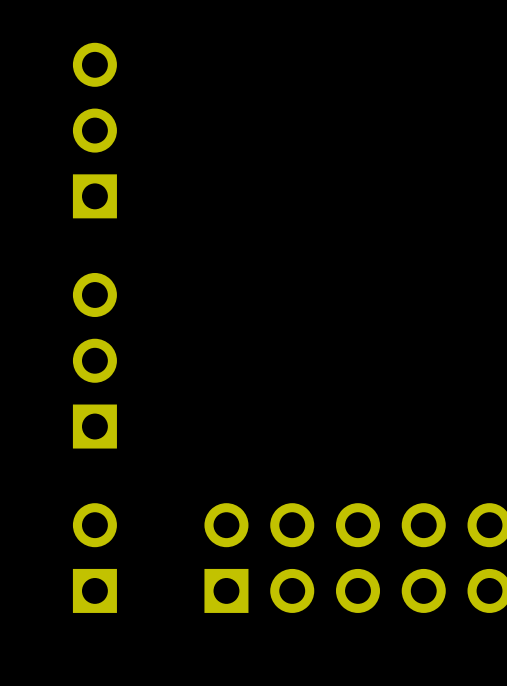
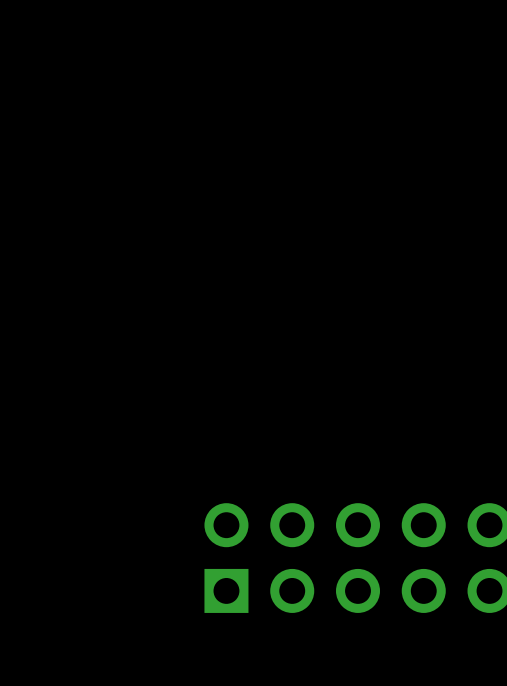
part: (94, 130) -> none
part: (94, 360) -> none
part: (94, 558) -> none

